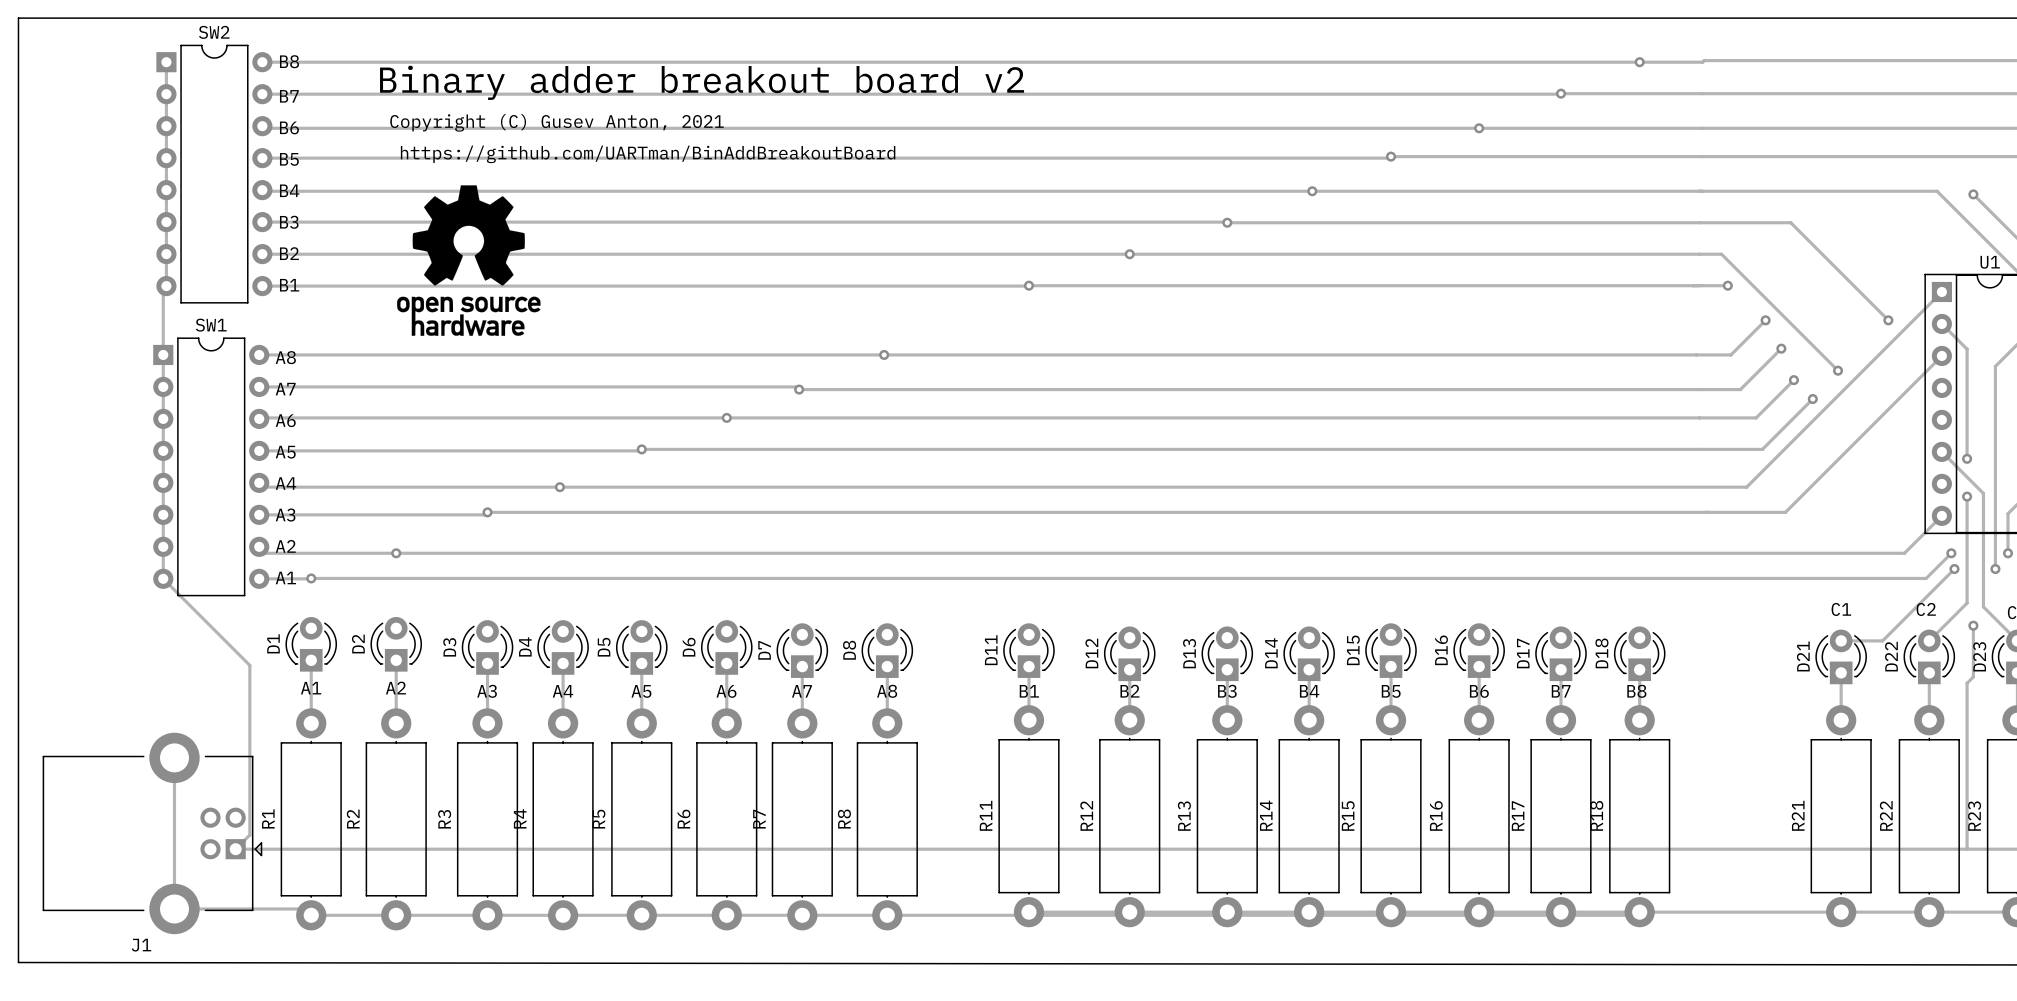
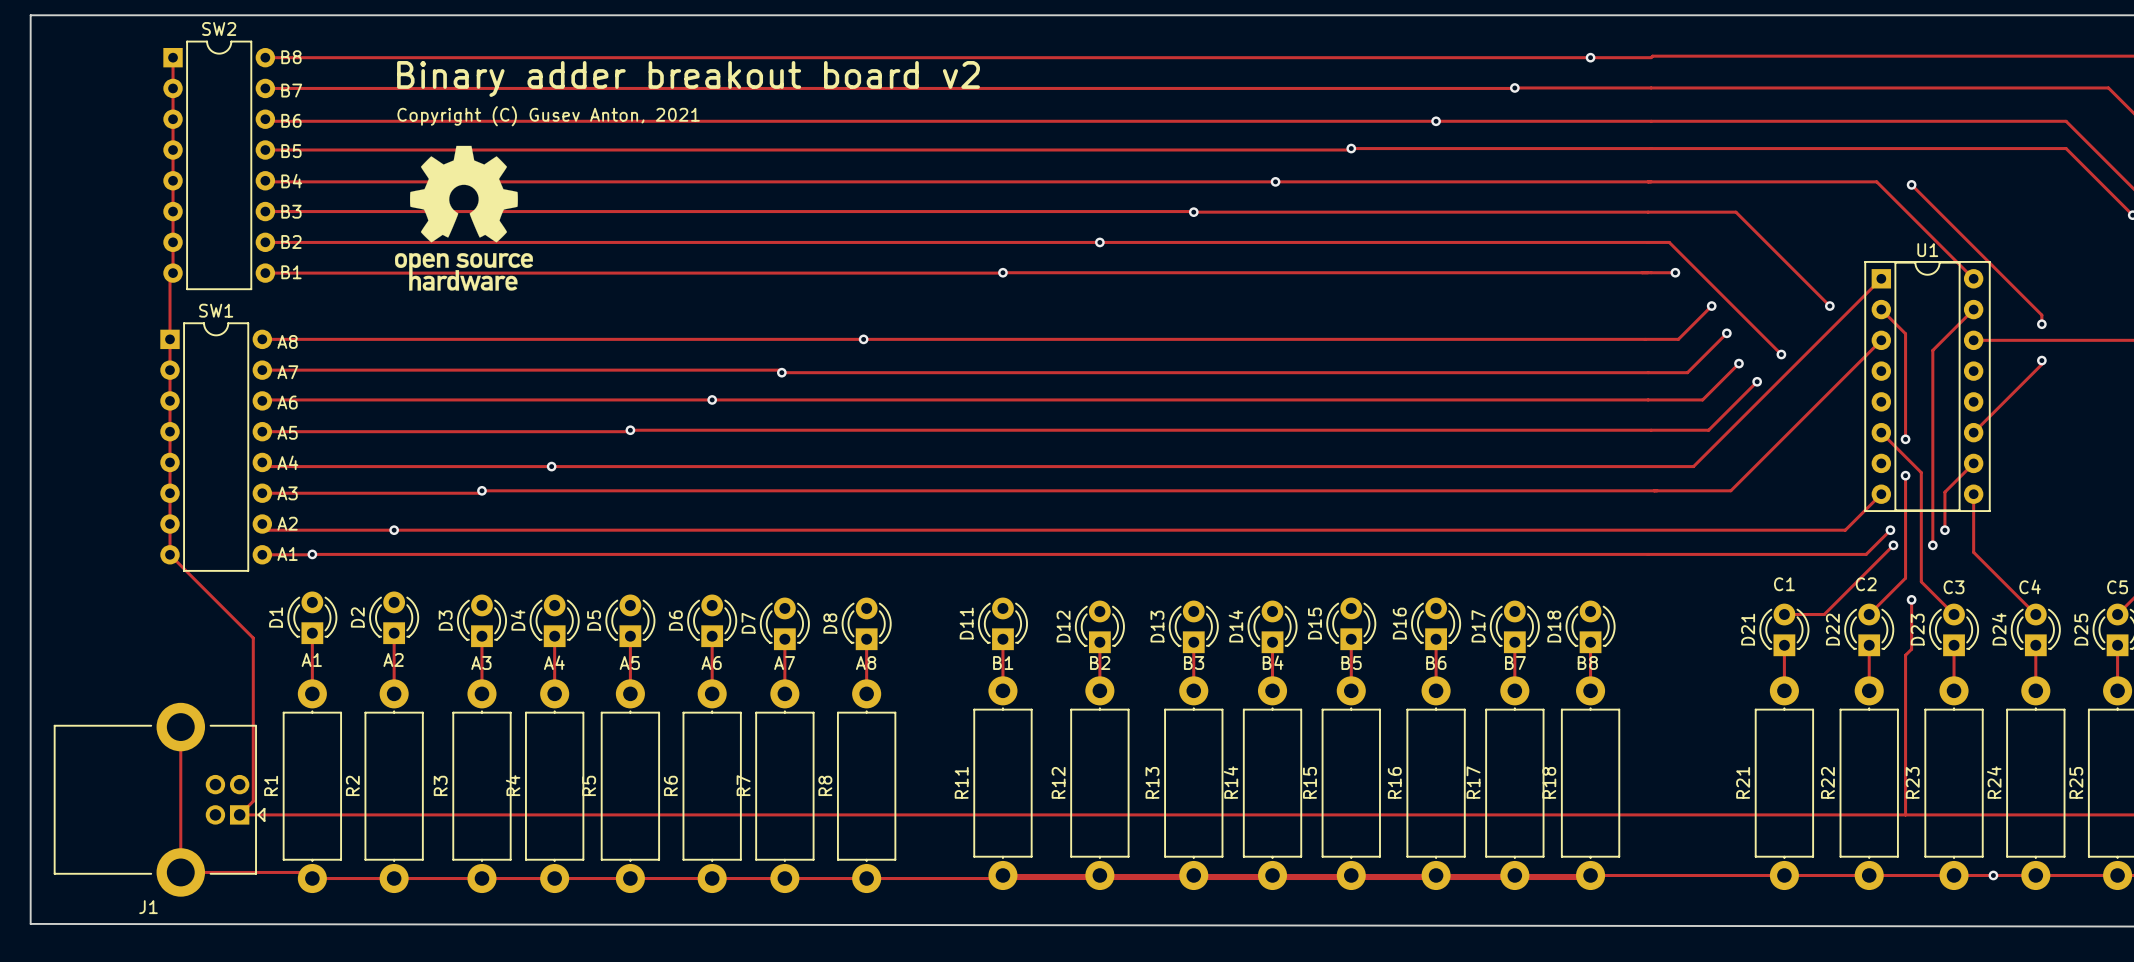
text: https://github.com/UARTman/BinAddBreakoutBoard (648, 154) -> none
drawing position: (468, 260) -> (463, 218)

